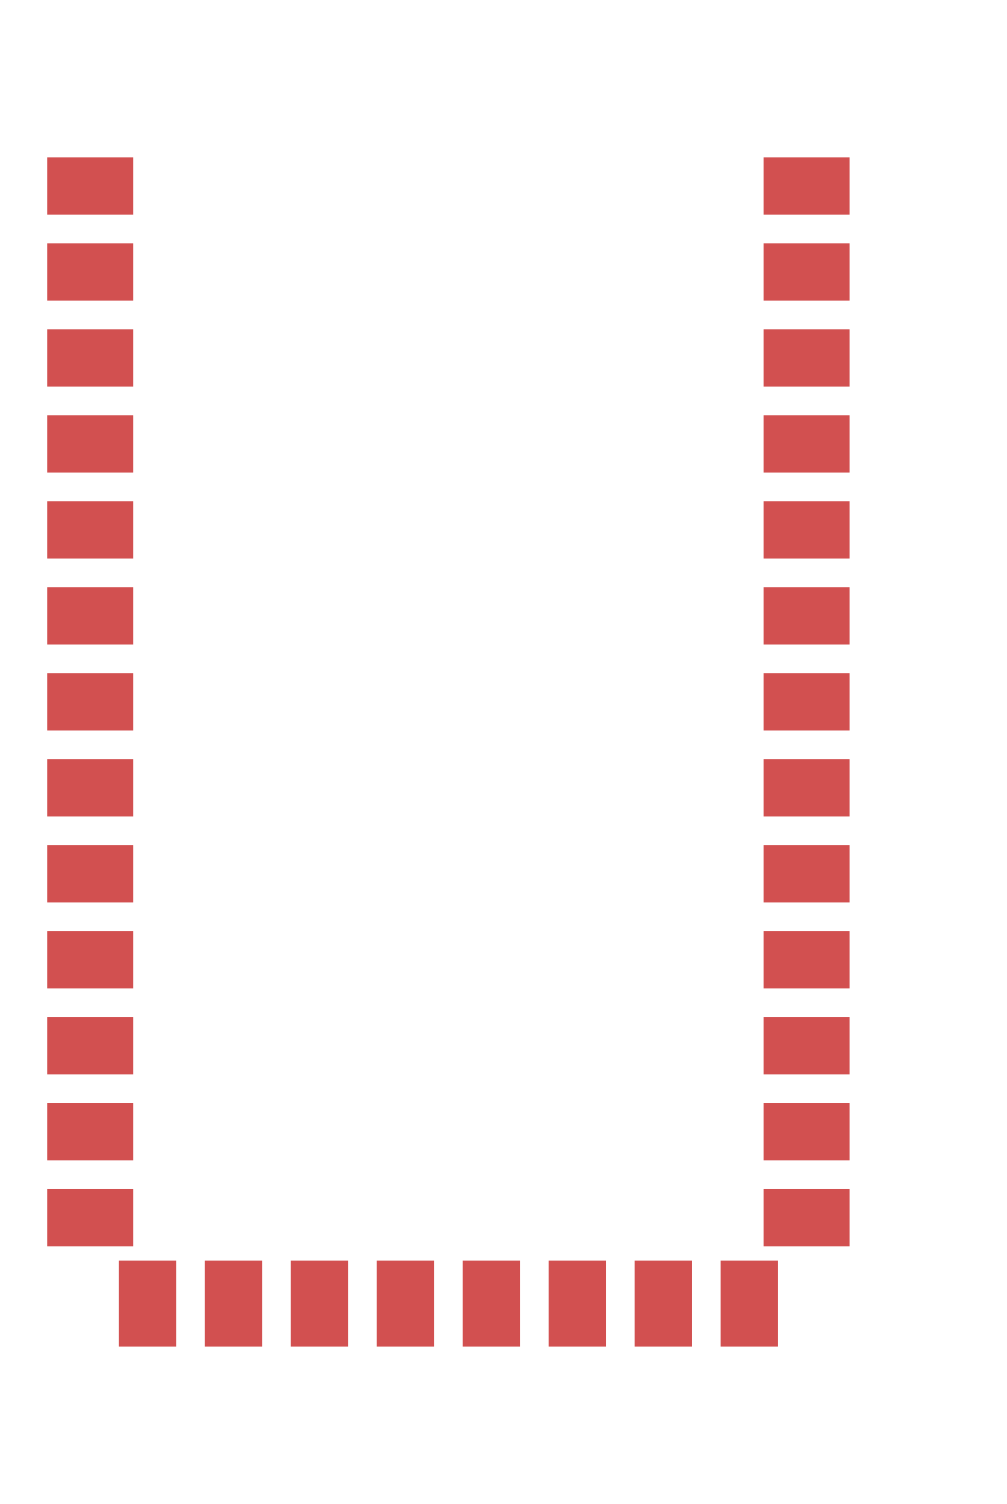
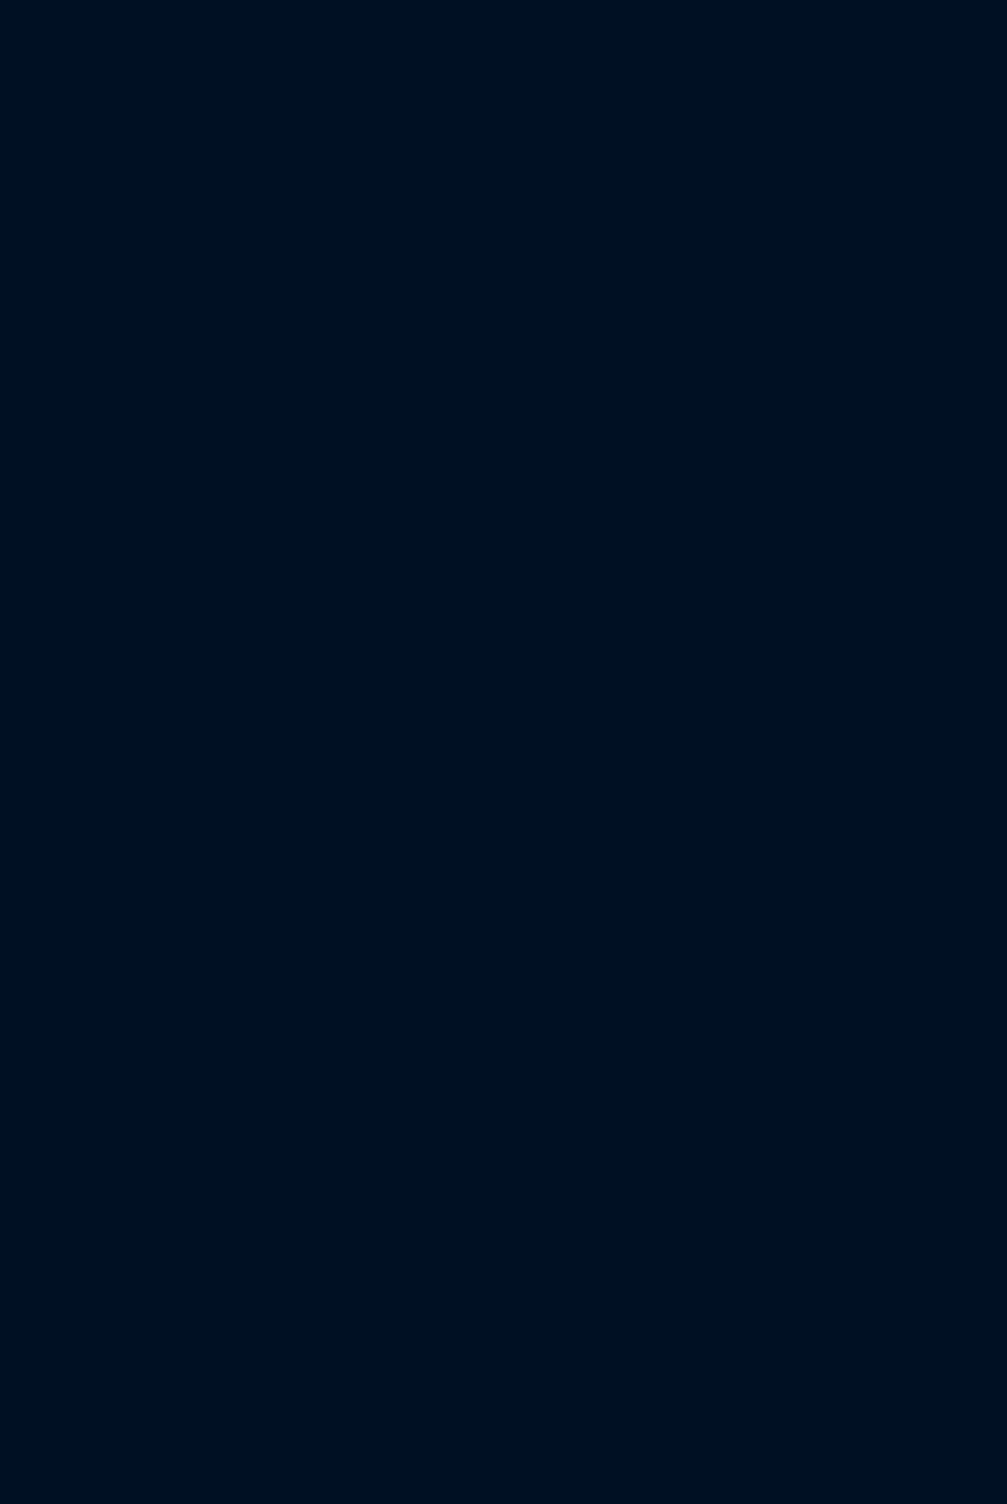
part: (448, 751) -> none

